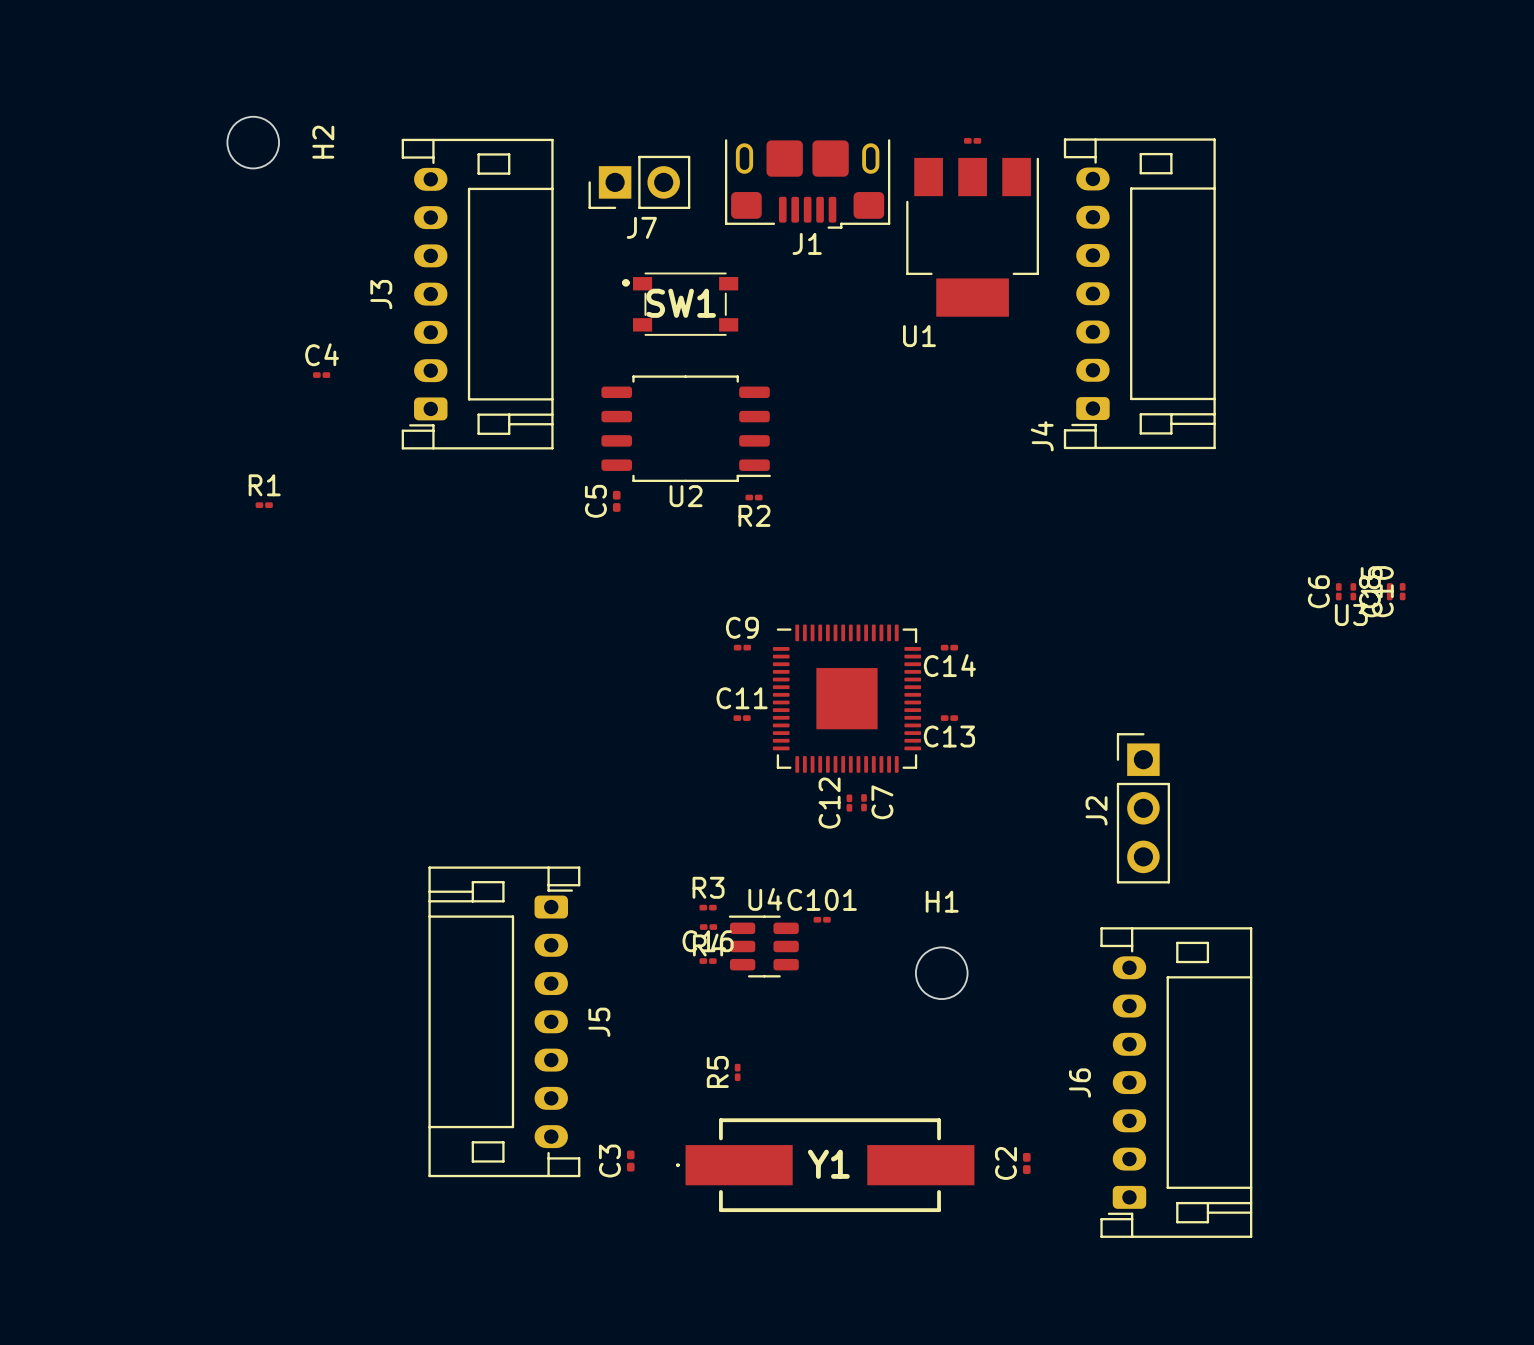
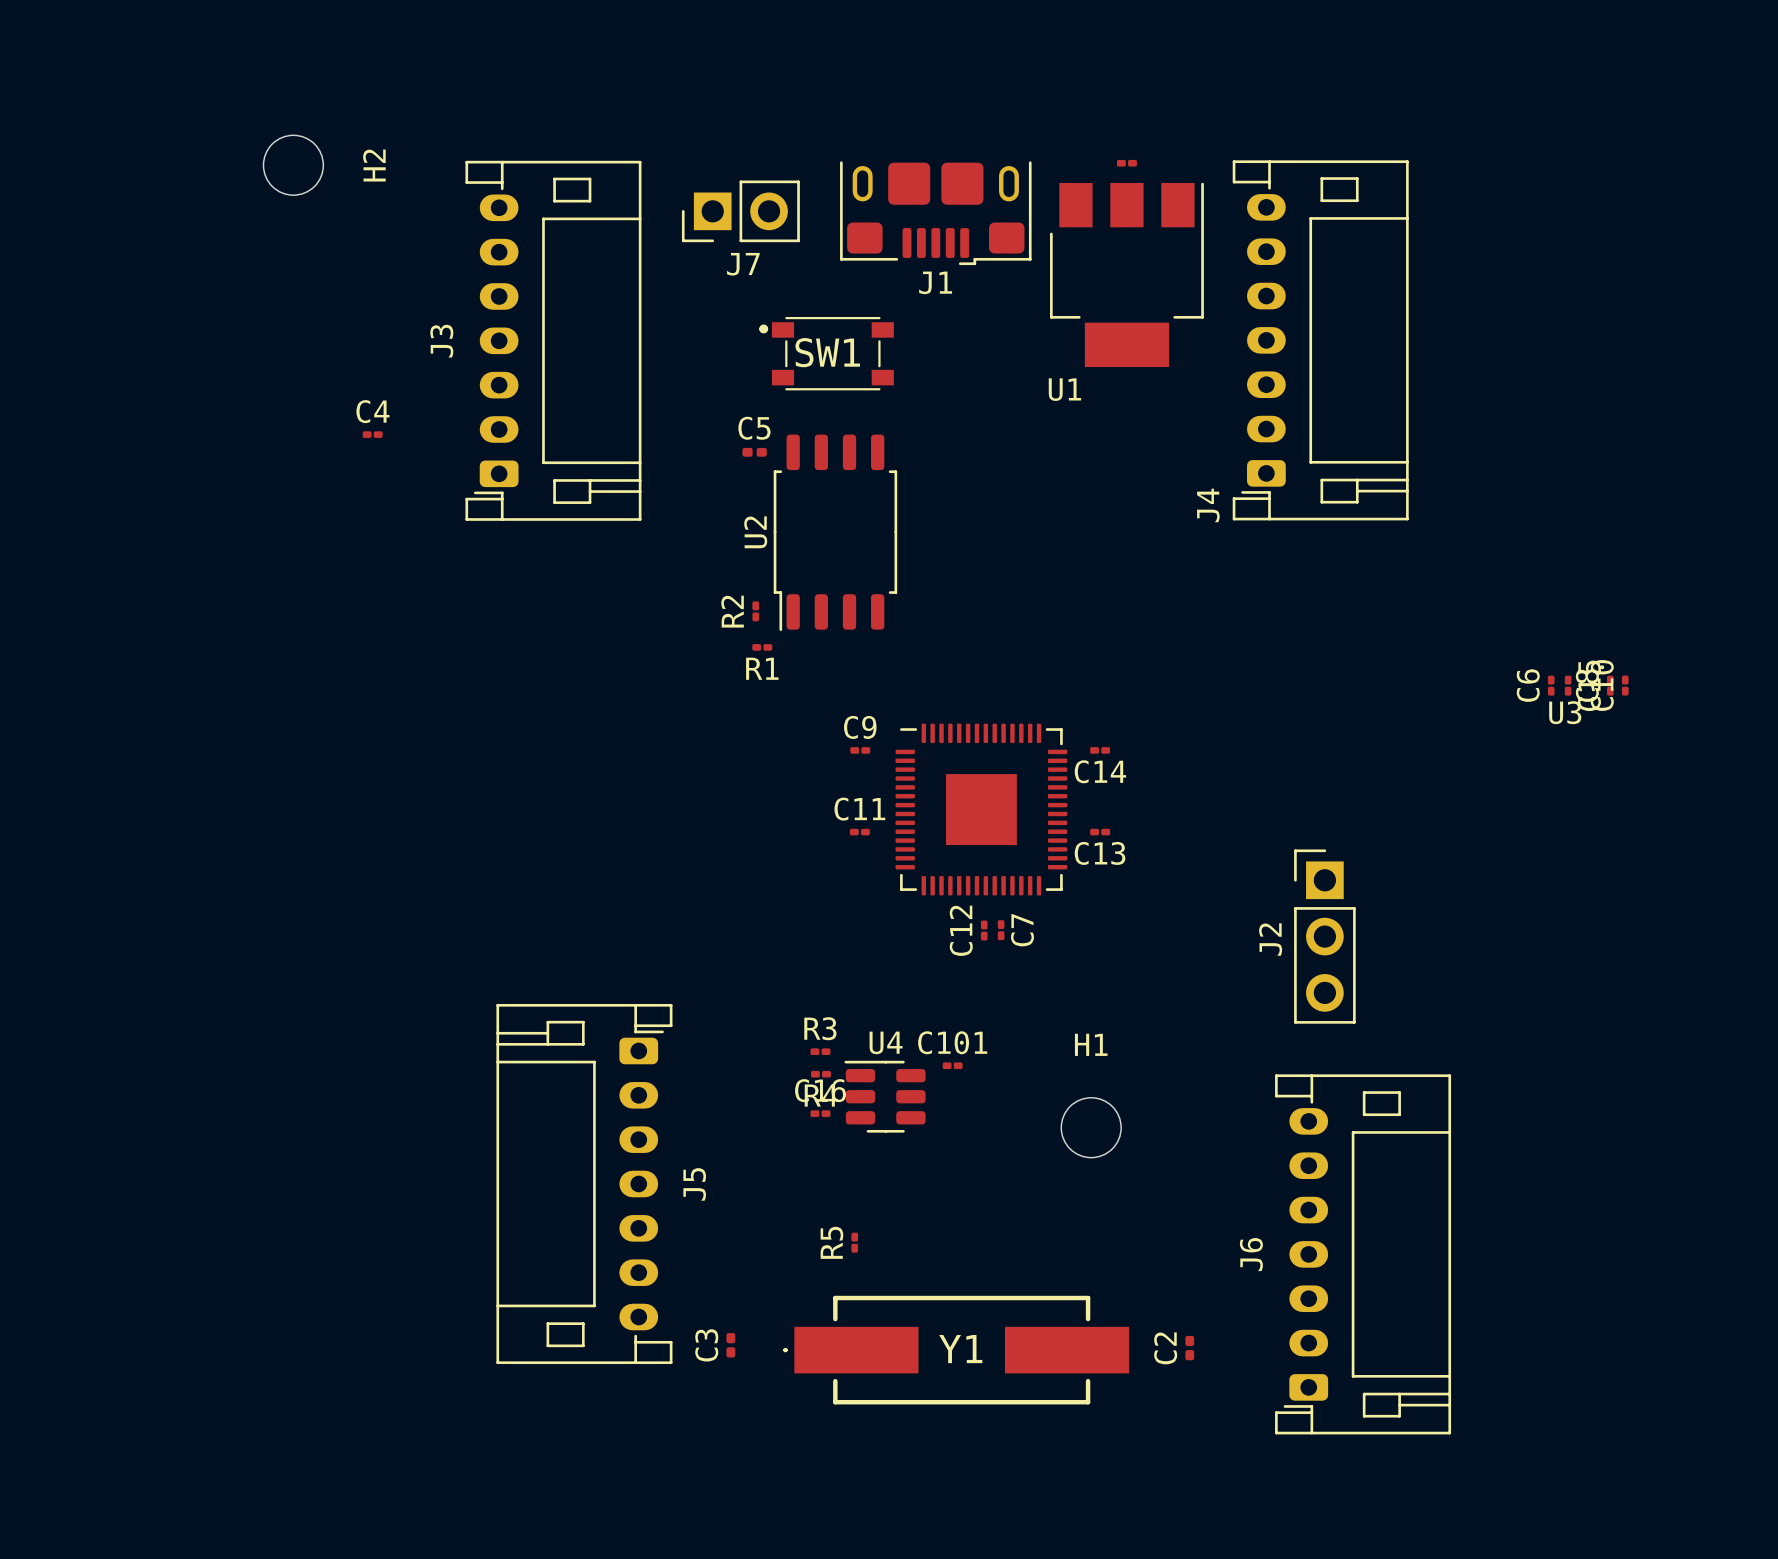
SW1 position: (680, 304) -> (826, 353)
U2 rotation: 0° (686, 428) -> 90° clockwise (835, 532)
R1 name position: R1 (264, 485) -> R1 (762, 668)
R2 rotation: 0° (754, 497) -> 90° clockwise (755, 611)
R2 position: (754, 497) -> (755, 611)
C5 rotation: 0° (616, 501) -> 90° clockwise (754, 452)
C5 position: (616, 501) -> (754, 452)
R1 position: (264, 505) -> (762, 647)

